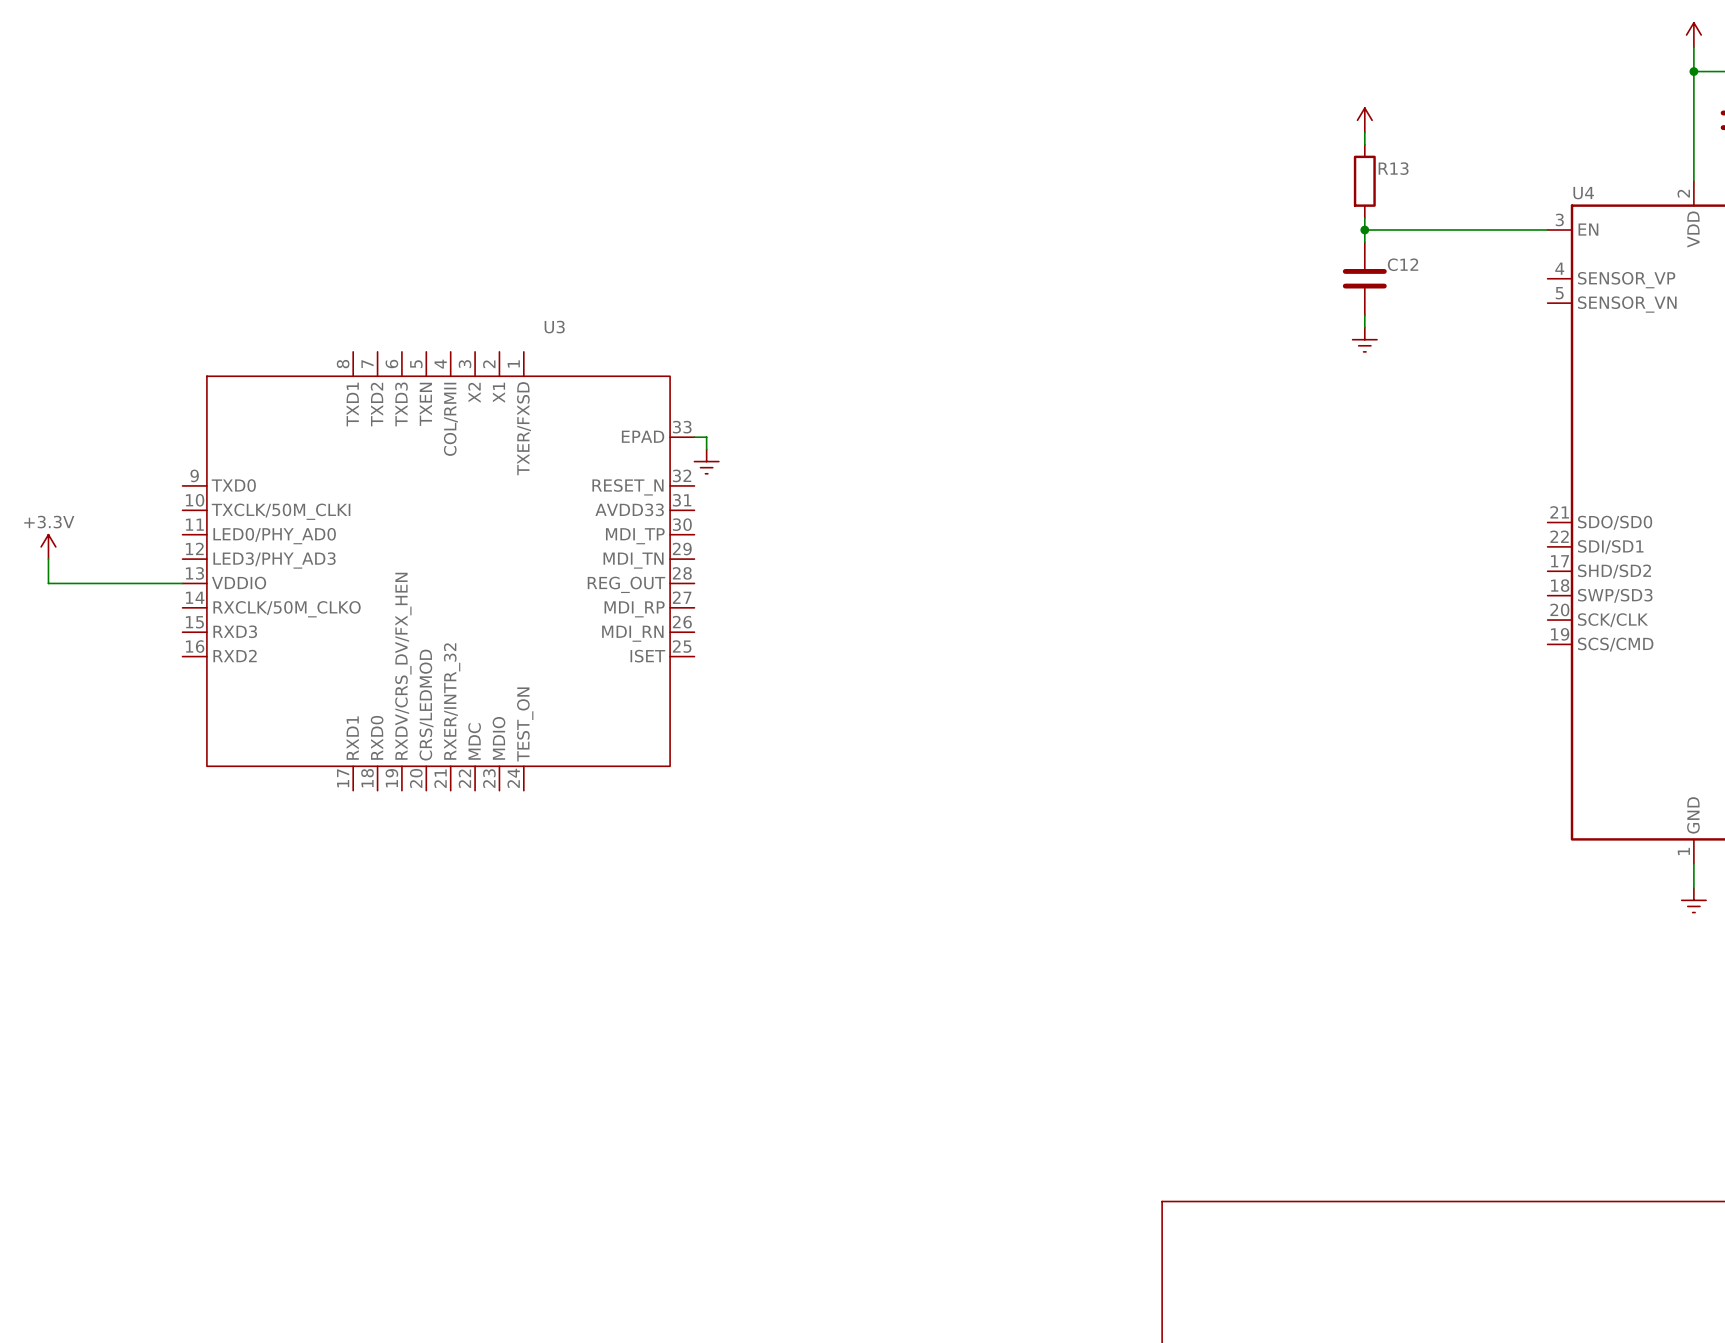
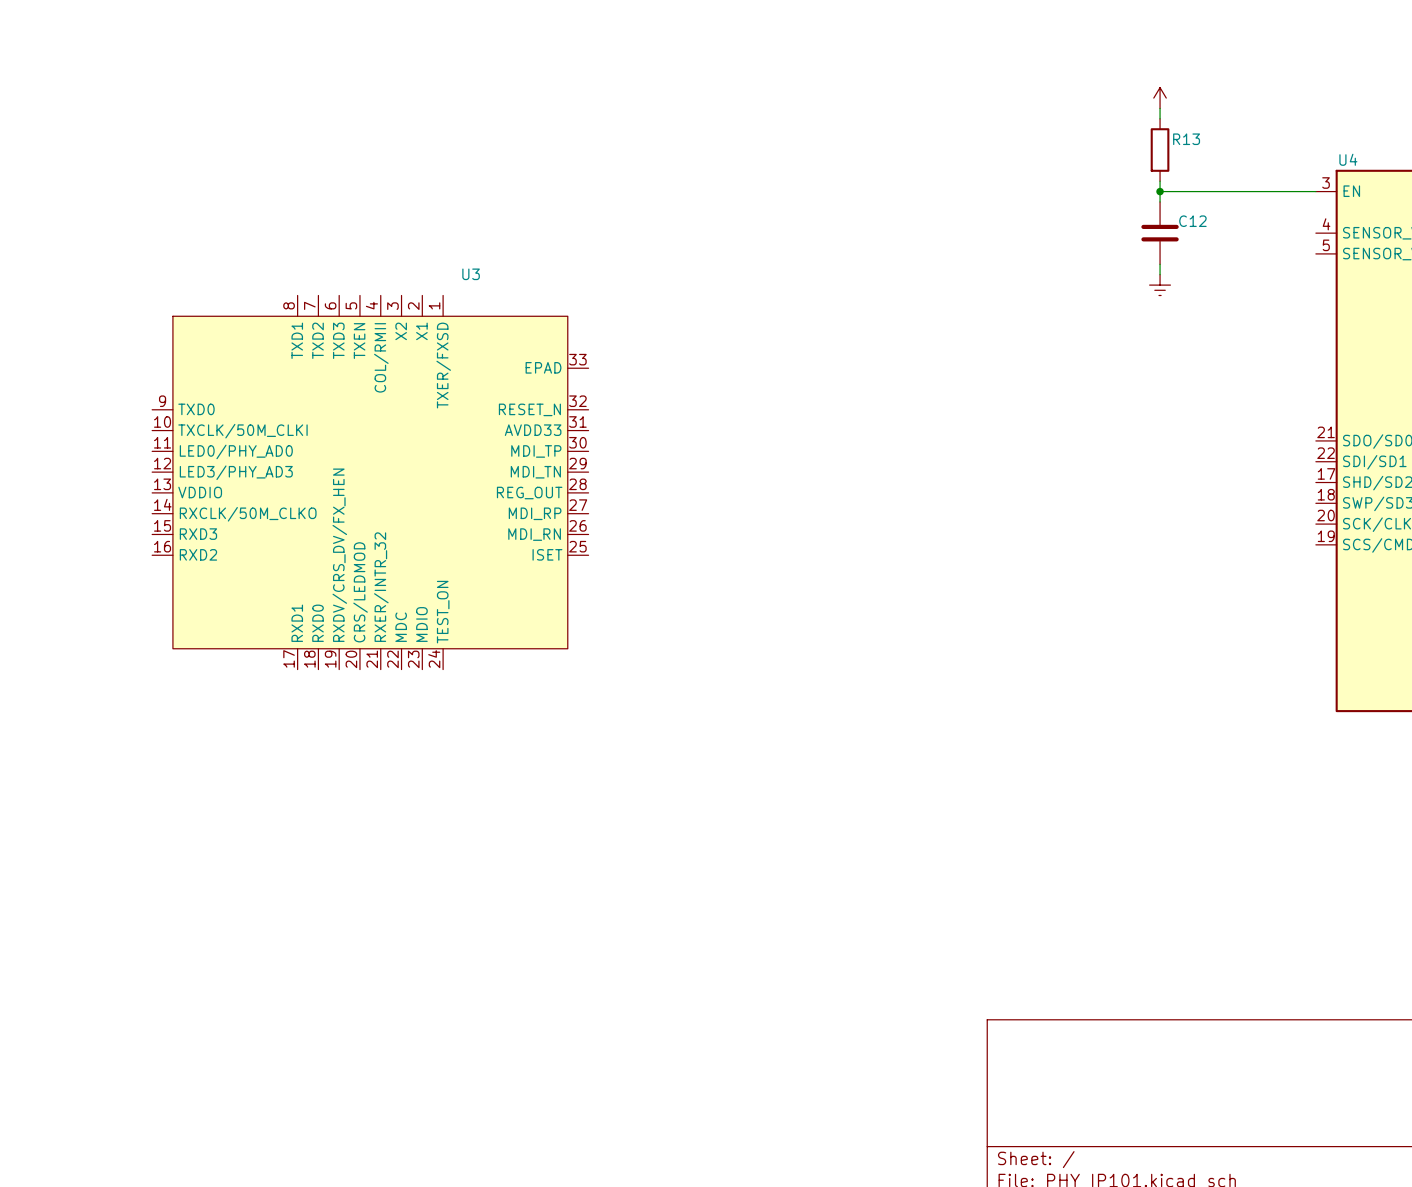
wire: (694, 437) (706, 437) (706, 449) -> none
power symbol: (706, 461) -> none
power symbol: +3.3V (48, 546) -> none
wire: (48, 559) (48, 583) (182, 583) -> none

